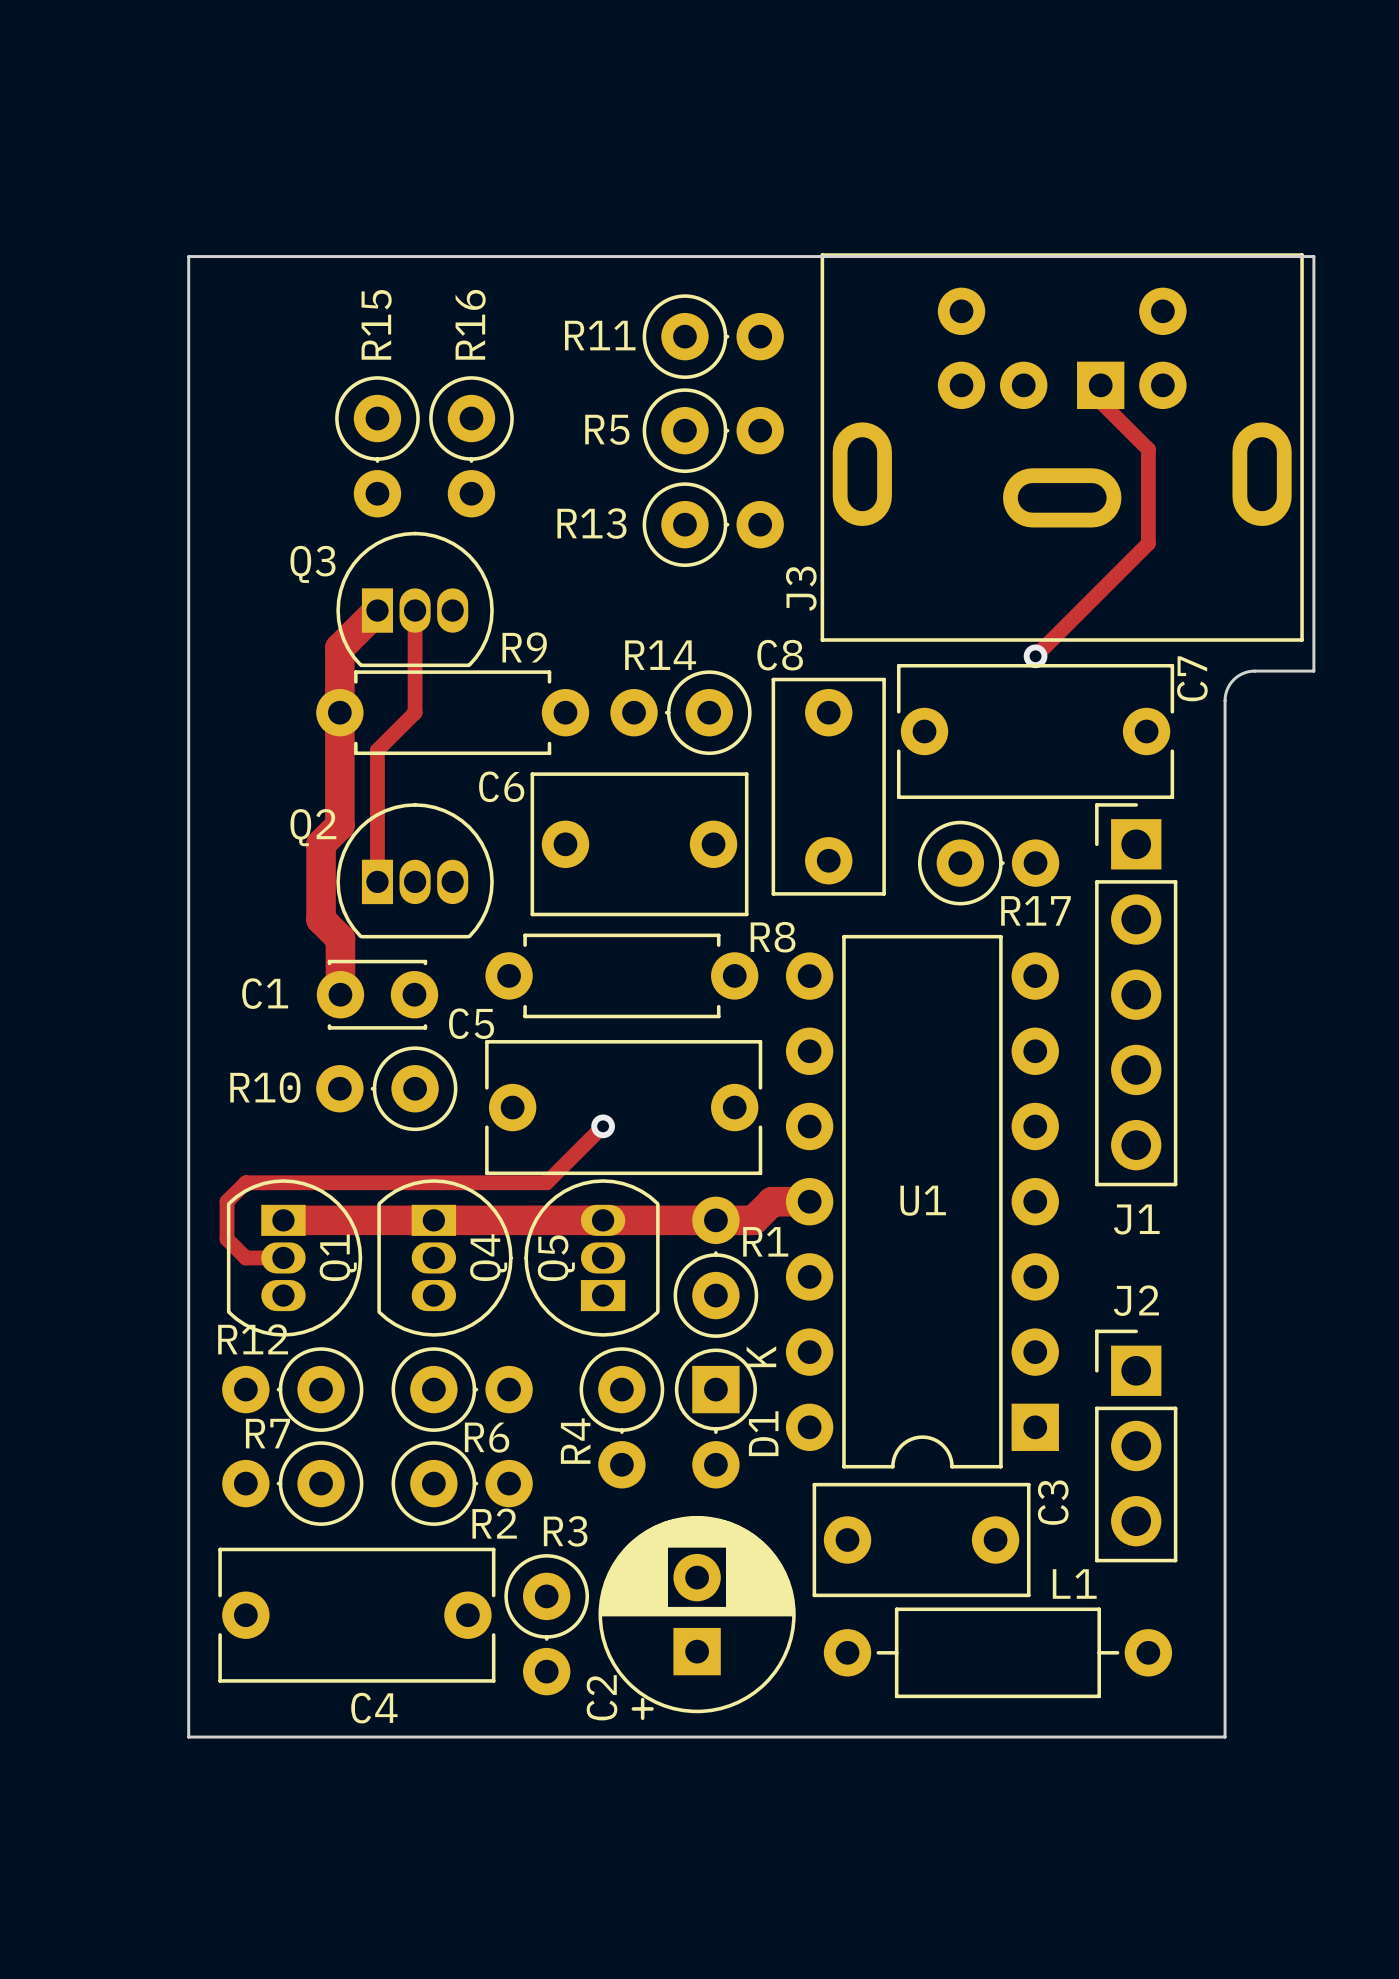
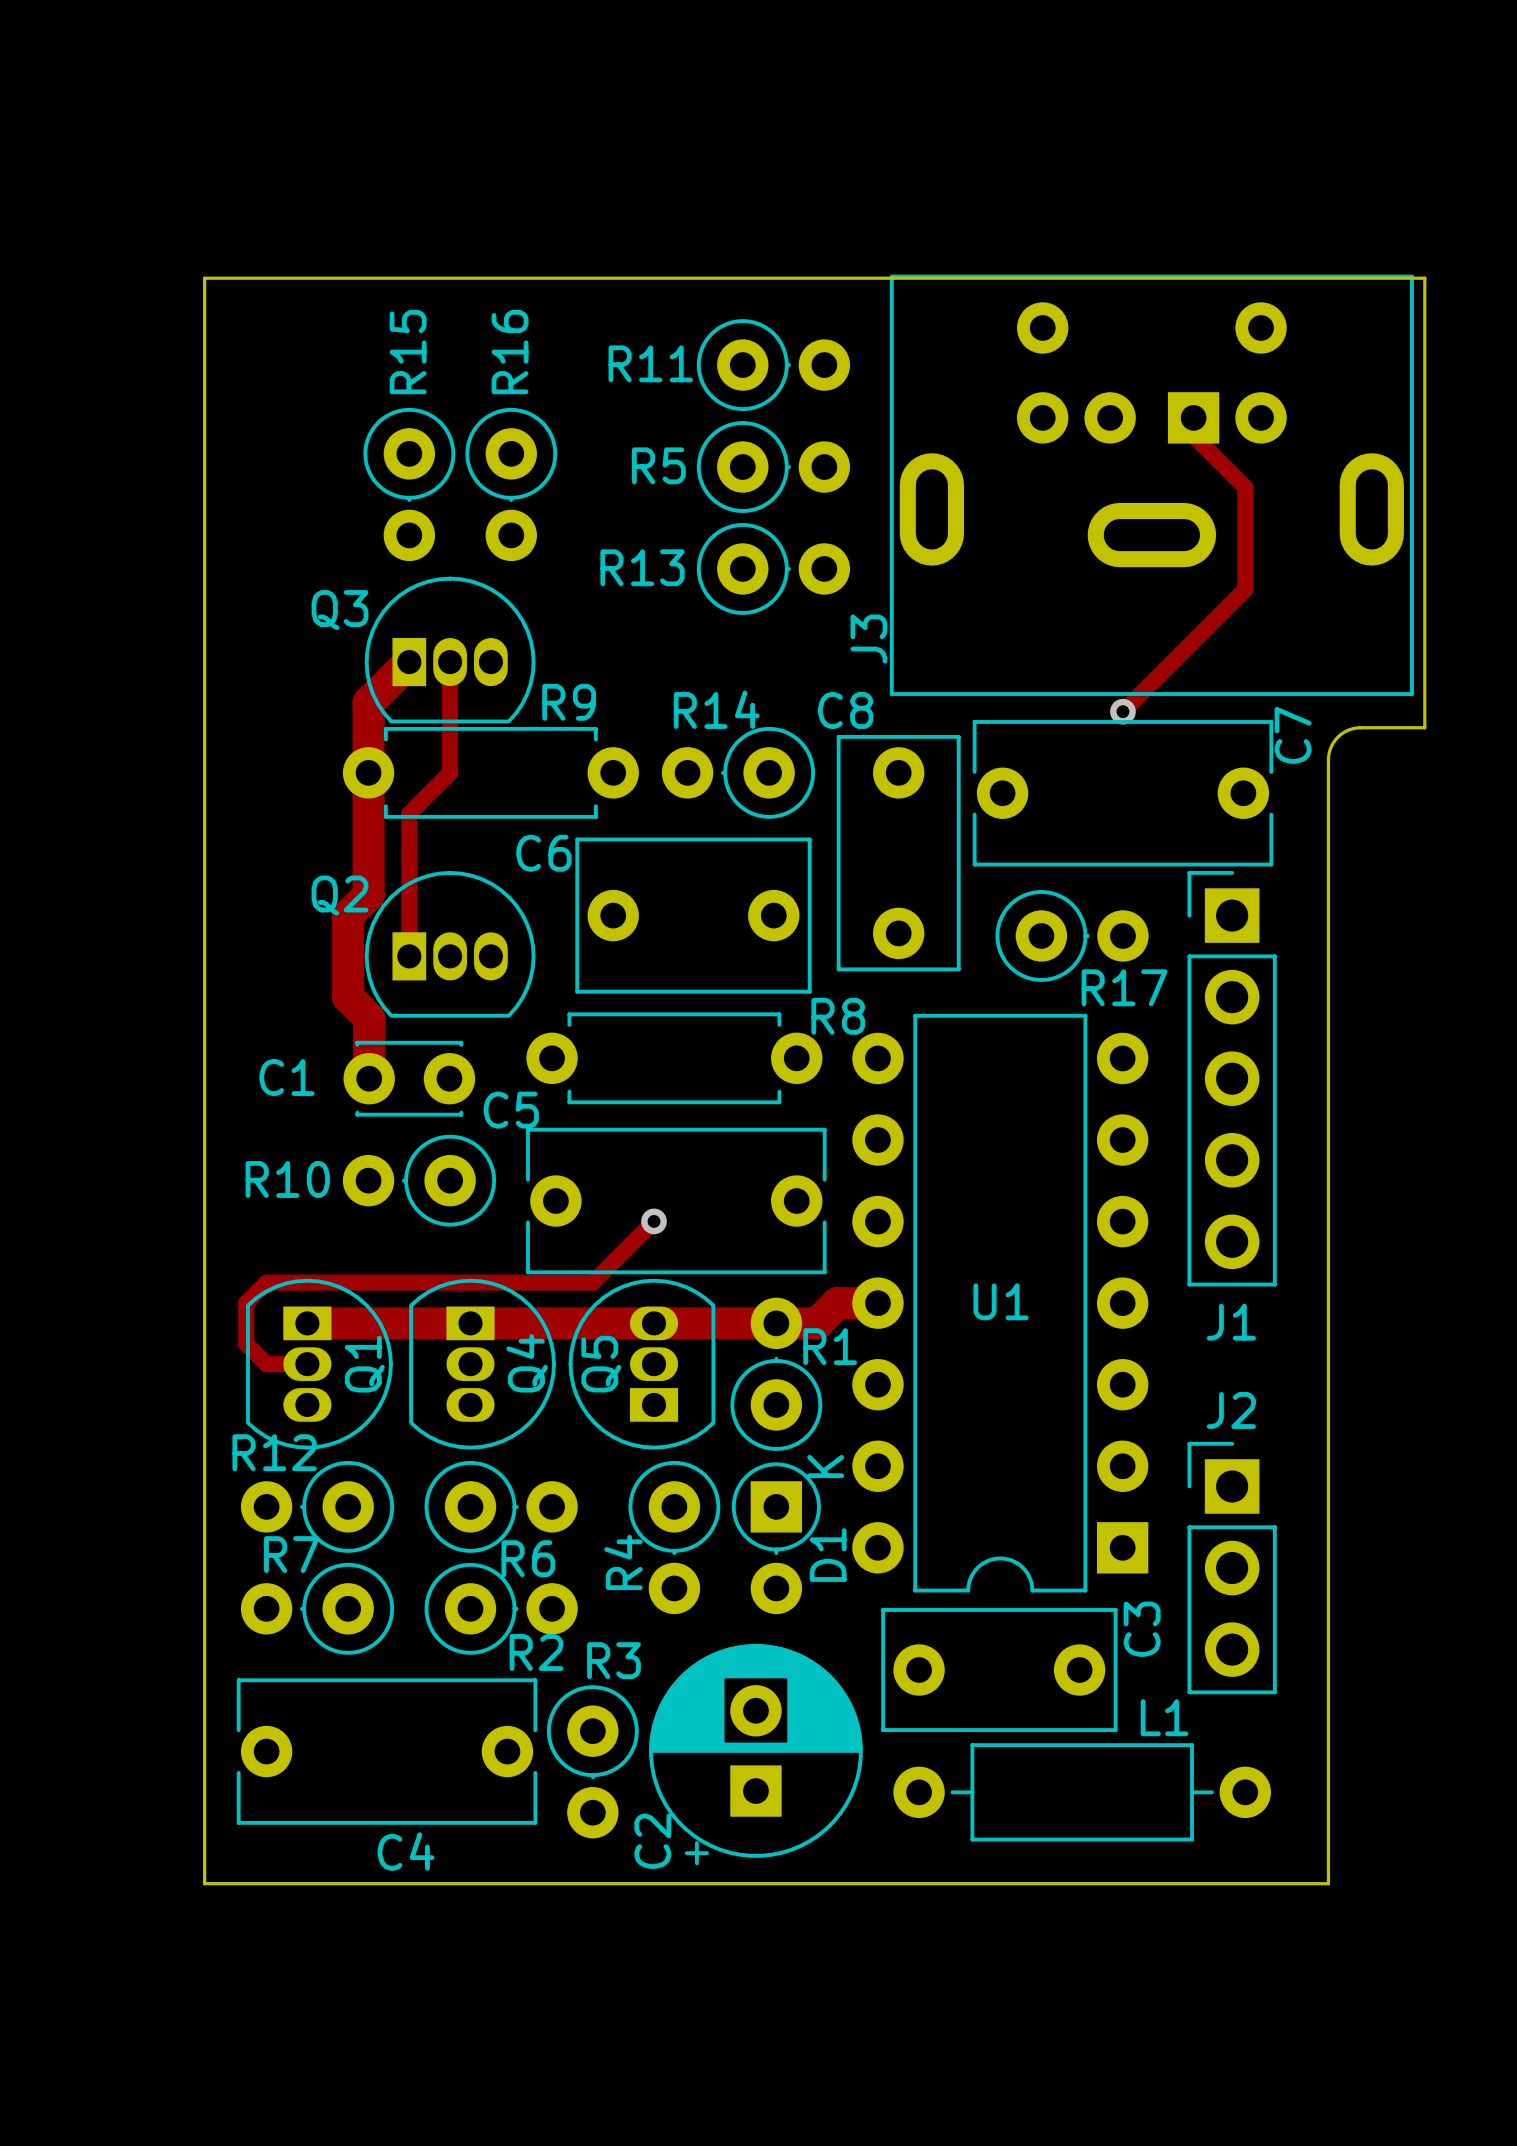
J3 footprint: [820, 253, 1304, 642] -> [889, 274, 1414, 696]

